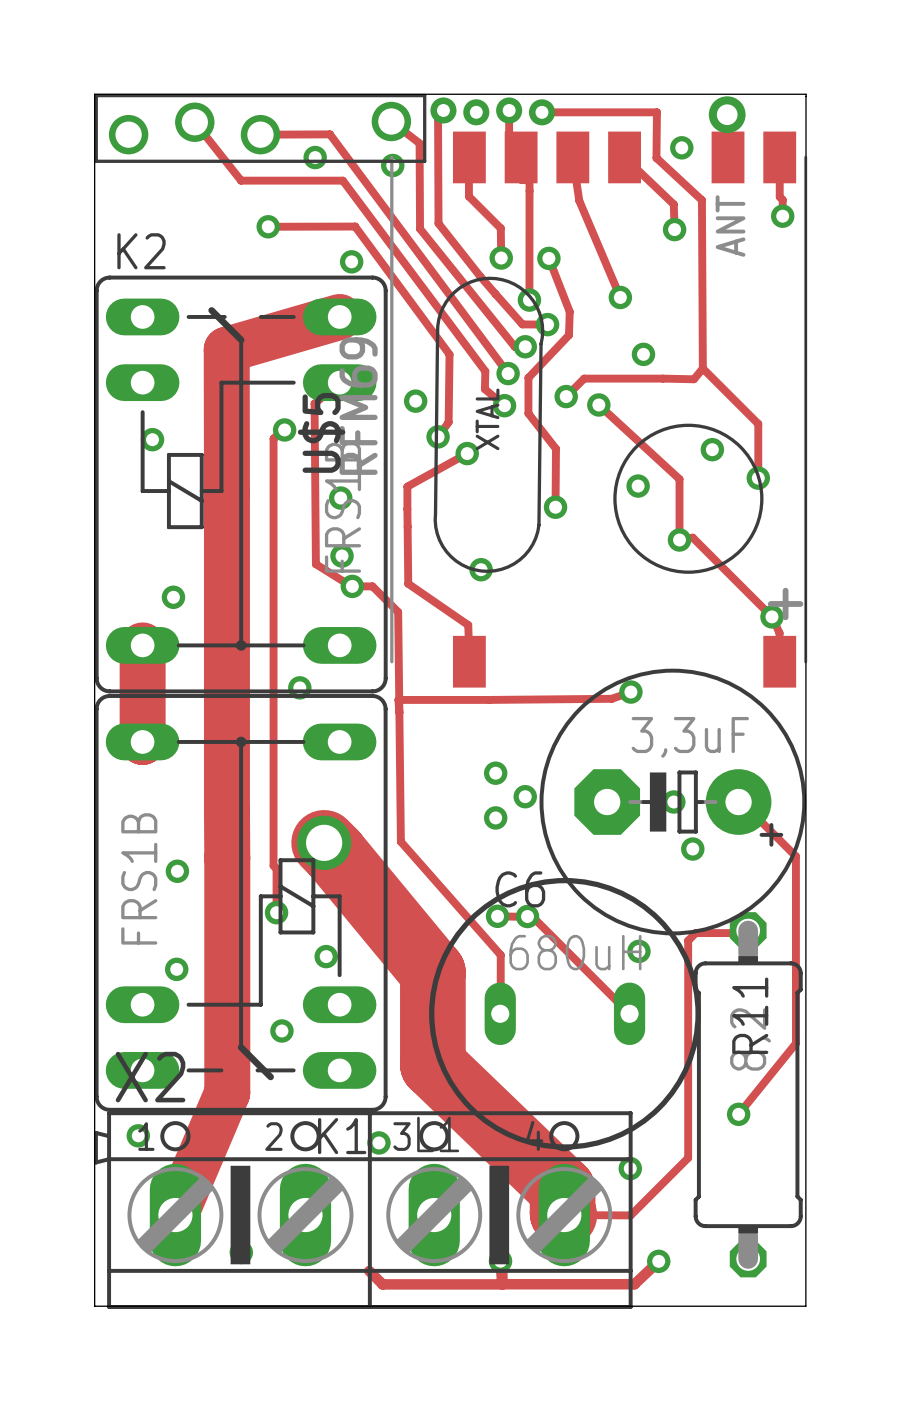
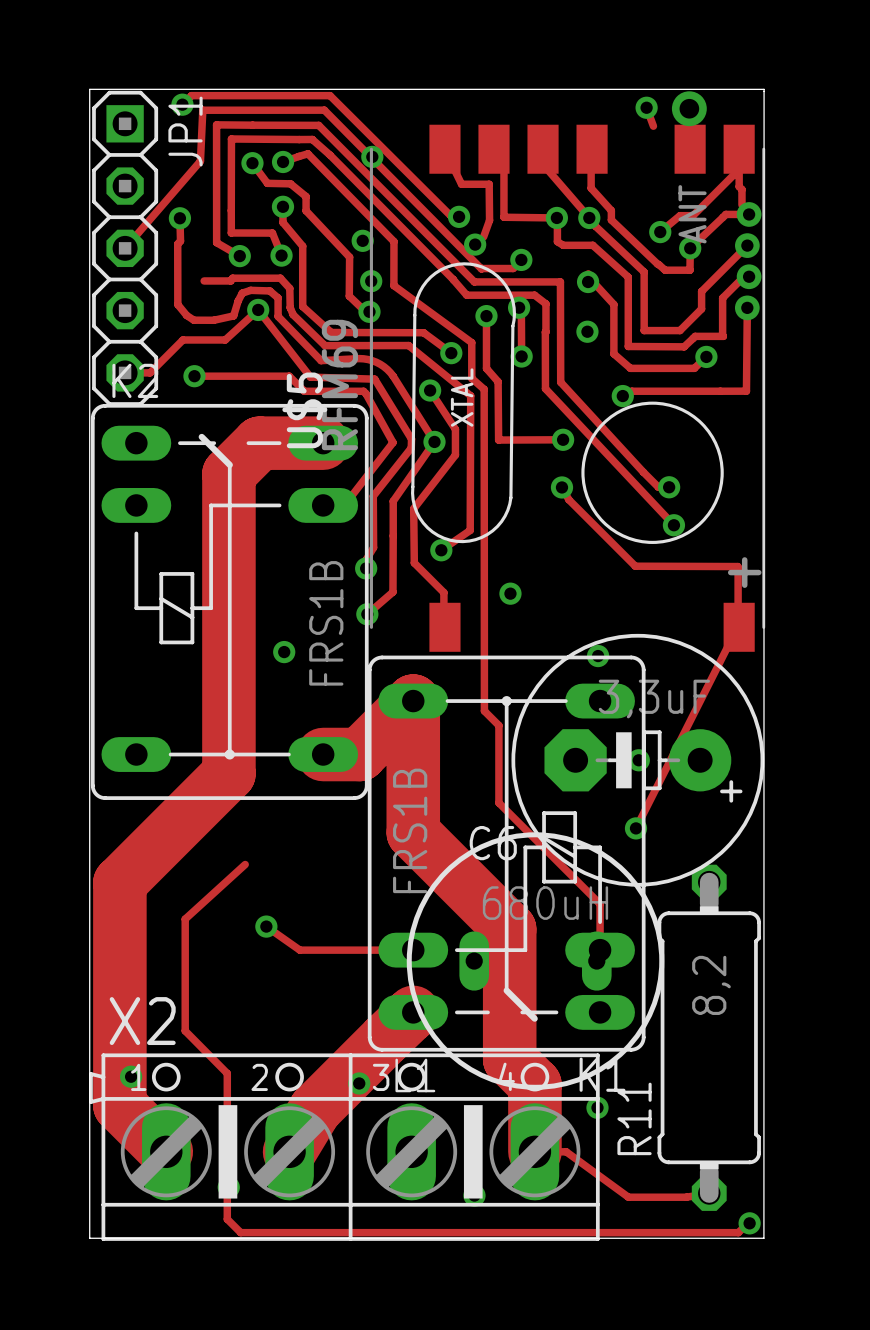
track: none -> (182, 104) (191, 95) (330, 95) (451, 216) (459, 216)
via: none -> (182, 104)
track: (443, 110) (438, 119) (438, 223) (480, 276) (522, 324) (547, 324) -> none
track: (509, 110) (509, 145) (521, 157) (521, 180) (529, 180) (529, 300) -> none
part rotation: 0° (492, 111) -> 90° clockwise (748, 261)
part position: (492, 111) -> (748, 261)
track: (541, 112) (656, 112) (656, 158) (701, 200) (702, 368) -> none
track: none -> (646, 107) (653, 126)
track: (391, 121) (419, 143) (420, 228) (514, 346) (525, 346) -> none
track: (194, 122) (241, 180) (342, 180) (485, 371) (484, 389) (504, 405) -> none
part: (260, 128) -> none
track: (260, 134) (329, 134) (508, 373) -> none
via position: (681, 147) -> (646, 107)
track: none -> (443, 148) (461, 184) (489, 184) (489, 220) (483, 236)
track: none -> (492, 148) (503, 168) (503, 217) (557, 218) (557, 241) (563, 245) (592, 245) (628, 277) (628, 346) (684, 346) (695, 336) (723, 336) (722, 298) (743, 276) (749, 276)
track: none -> (541, 148) (541, 163) (595, 226) (644, 272) (644, 330) (680, 330) (701, 308) (701, 291) (747, 245)
track: none -> (591, 148) (591, 188) (611, 210) (611, 220) (665, 270) (690, 270) (690, 248) (725, 214) (749, 214)
track: none -> (738, 148) (738, 170) (693, 215) (680, 215) (660, 232)
via position: (315, 157) -> (283, 161)
track: (469, 157) (468, 196) (500, 228) (501, 258) -> none
track: (572, 157) (579, 200) (620, 297) -> none
track: (624, 157) (673, 204) (674, 229) -> none
track: none -> (283, 161) (307, 153) (393, 241) (393, 285) (471, 342) (471, 378) (484, 389) (484, 711) (498, 725) (498, 802) (600, 904) (600, 950)
track: none -> (252, 163) (267, 183) (290, 183) (306, 196) (306, 210) (349, 257) (349, 296) (365, 311) (369, 311)
via: none -> (252, 163)
via: (782, 216) -> none
track: none -> (282, 206) (282, 222) (302, 246) (302, 306) (331, 332) (423, 332) (451, 353)
via: none -> (282, 206)
track: (268, 226) (355, 226) (449, 354) (448, 422) (438, 436) -> none
via: (268, 226) -> none
via: none -> (459, 216)
via: none -> (556, 217)
via: none -> (589, 217)
via: (674, 229) -> none
track: none -> (179, 218) (180, 241) (177, 243) (177, 304) (186, 315) (193, 320) (213, 320) (233, 315) (242, 293) (250, 290) (269, 290) (278, 297) (278, 316) (321, 360) (363, 358) (376, 362) (387, 369) (434, 441) (393, 501) (392, 592) (367, 614)
via: none -> (179, 218)
via: none -> (660, 232)
via: none -> (362, 240)
track: (548, 258) (569, 311) (568, 335) (528, 377) (528, 413) (555, 448) (555, 507) -> none
via position: (548, 258) -> (521, 259)
track: none -> (125, 248) (200, 161) (202, 110) (324, 110) (481, 268) (513, 268) (521, 260)
JP1: none -> (125, 248)
via: (351, 261) -> none
via: none -> (690, 248)
track: none -> (281, 255) (272, 233) (231, 232) (231, 138) (312, 139) (330, 155) (466, 295) (534, 295) (545, 303) (545, 388) (673, 525)
via: none -> (281, 255)
track: none -> (239, 256) (216, 242) (216, 124) (318, 125) (474, 281) (560, 281) (560, 382) (658, 487) (669, 487)
via: none -> (239, 256)
track: none -> (588, 273) (589, 278) (613, 304) (613, 353) (630, 368) (694, 368) (706, 356)
track: none -> (204, 280) (230, 280) (232, 278) (280, 278) (289, 288) (290, 307) (293, 314) (325, 345) (408, 345) (470, 395) (470, 530) (441, 550)
via: none -> (371, 281)
via: (529, 300) -> none
track: (339, 316) (226, 349) (227, 1092) (175, 1215) -> (323, 443) (259, 443) (228, 473) (228, 773) (119, 882) (119, 1105) (166, 1151)
track: none -> (747, 307) (746, 391) (631, 391) (622, 396)
via: none -> (258, 309)
via: none -> (369, 311)
track: none -> (521, 315) (521, 356)
track: none -> (486, 316) (486, 368) (498, 381) (498, 440) (563, 439)
via position: (525, 346) -> (486, 316)
via position: (643, 354) -> (587, 331)
track: (702, 368) (693, 379) (584, 378) (566, 396) -> none
track: (702, 368) (758, 423) (758, 478) -> none
via: none -> (451, 353)
via: (508, 373) -> none
via: none -> (521, 356)
via: none -> (706, 356)
track: (339, 382) (314, 403) (315, 564) (352, 586) (372, 586) (398, 612) (400, 841) (500, 955) (500, 1013) -> none
track: none -> (125, 372) (150, 372) (182, 339) (225, 339) (258, 309) (310, 377) (374, 379) (411, 439) (411, 448) (373, 496) (373, 547) (366, 559) (366, 568)
track: none -> (194, 376) (289, 376) (304, 391) (363, 391) (365, 393) (393, 442) (343, 506) (323, 505)
via: none -> (194, 376)
via: (566, 396) -> none
via: (415, 401) -> none
track: (598, 404) (679, 479) (679, 539) (692, 537) (772, 616) (779, 633) (779, 661) -> none
via: (598, 404) -> none
via: (504, 405) -> none
track: none -> (430, 390) (455, 429) (455, 455) (413, 508) (414, 563) (443, 592) (443, 626)
via: none -> (430, 390)
via: none -> (622, 396)
track: (284, 429) (283, 428) (273, 438) (273, 865) (276, 868) (276, 912) -> none
via: (284, 429) -> none
via: (438, 436) -> none
via: (152, 439) -> none
via: (712, 449) -> none
track: (467, 453) (407, 486) (407, 509) (408, 583) (468, 625) (469, 661) -> none
via position: (467, 453) -> (434, 441)
via: none -> (563, 439)
via: (758, 478) -> none
K2 position: (241, 484) -> (229, 601)
via: (638, 486) -> none
via: (340, 498) -> none
via: (555, 507) -> none
track: none -> (561, 487) (568, 499) (635, 566) (737, 566) (738, 626) (636, 828)
via: none -> (561, 487)
via: none -> (669, 487)
via: (679, 539) -> none
via: none -> (673, 525)
via: (342, 556) -> none
via position: (481, 569) -> (441, 550)
via: (352, 586) -> none
via: (173, 597) -> none
via: none -> (366, 568)
via: (772, 616) -> none
via: none -> (510, 593)
track: (142, 645) (142, 741) -> none
via: none -> (367, 614)
track: (630, 692) (611, 698) (398, 699) (399, 712) -> none
via: (495, 773) -> none
track: none -> (323, 754) (359, 754) (413, 701) (413, 832) (509, 929) (509, 1059) (534, 1084) (534, 1151) (566, 1151) (628, 1197) (686, 1197) (709, 1193)
via: (525, 796) -> none
track: (738, 802) (747, 808) (795, 856) (795, 1043) (738, 1114) -> none
via: (495, 817) -> none
track: (324, 842) (432, 972) (432, 1064) (562, 1189) (562, 1213) (564, 1215) (630, 1215) (688, 1157) (688, 940) (695, 933) (745, 933) (748, 930) -> none
via: (324, 842) -> none
via position: (692, 849) -> (636, 828)
via: (177, 871) -> none
K1 position: (241, 902) -> (506, 853)
track: none -> (245, 864) (185, 919) (185, 1030) (227, 1073) (227, 1219) (240, 1232) (738, 1232) (752, 1218) (749, 1223)
via: (276, 912) -> none
track: (497, 916) (532, 917) (629, 1013) -> none
via: (497, 916) -> none
via: (527, 916) -> none
via: (638, 951) -> none
via: (326, 956) -> none
via: (176, 969) -> none
track: none -> (266, 926) (299, 950) (413, 950)
via: none -> (266, 926)
R11 name position: R11 (750, 1015) -> R11 (634, 1118)
via: (281, 1030) -> none
track: none -> (413, 1012) (315, 1109) (289, 1151)
via: (738, 1114) -> none
track: (500, 1261) (502, 1284) (634, 1284) (658, 1261) -> none
via: (658, 1261) -> none
track: (502, 1262) (502, 1284) (382, 1284) (369, 1271) -> none
via: none -> (749, 1223)

